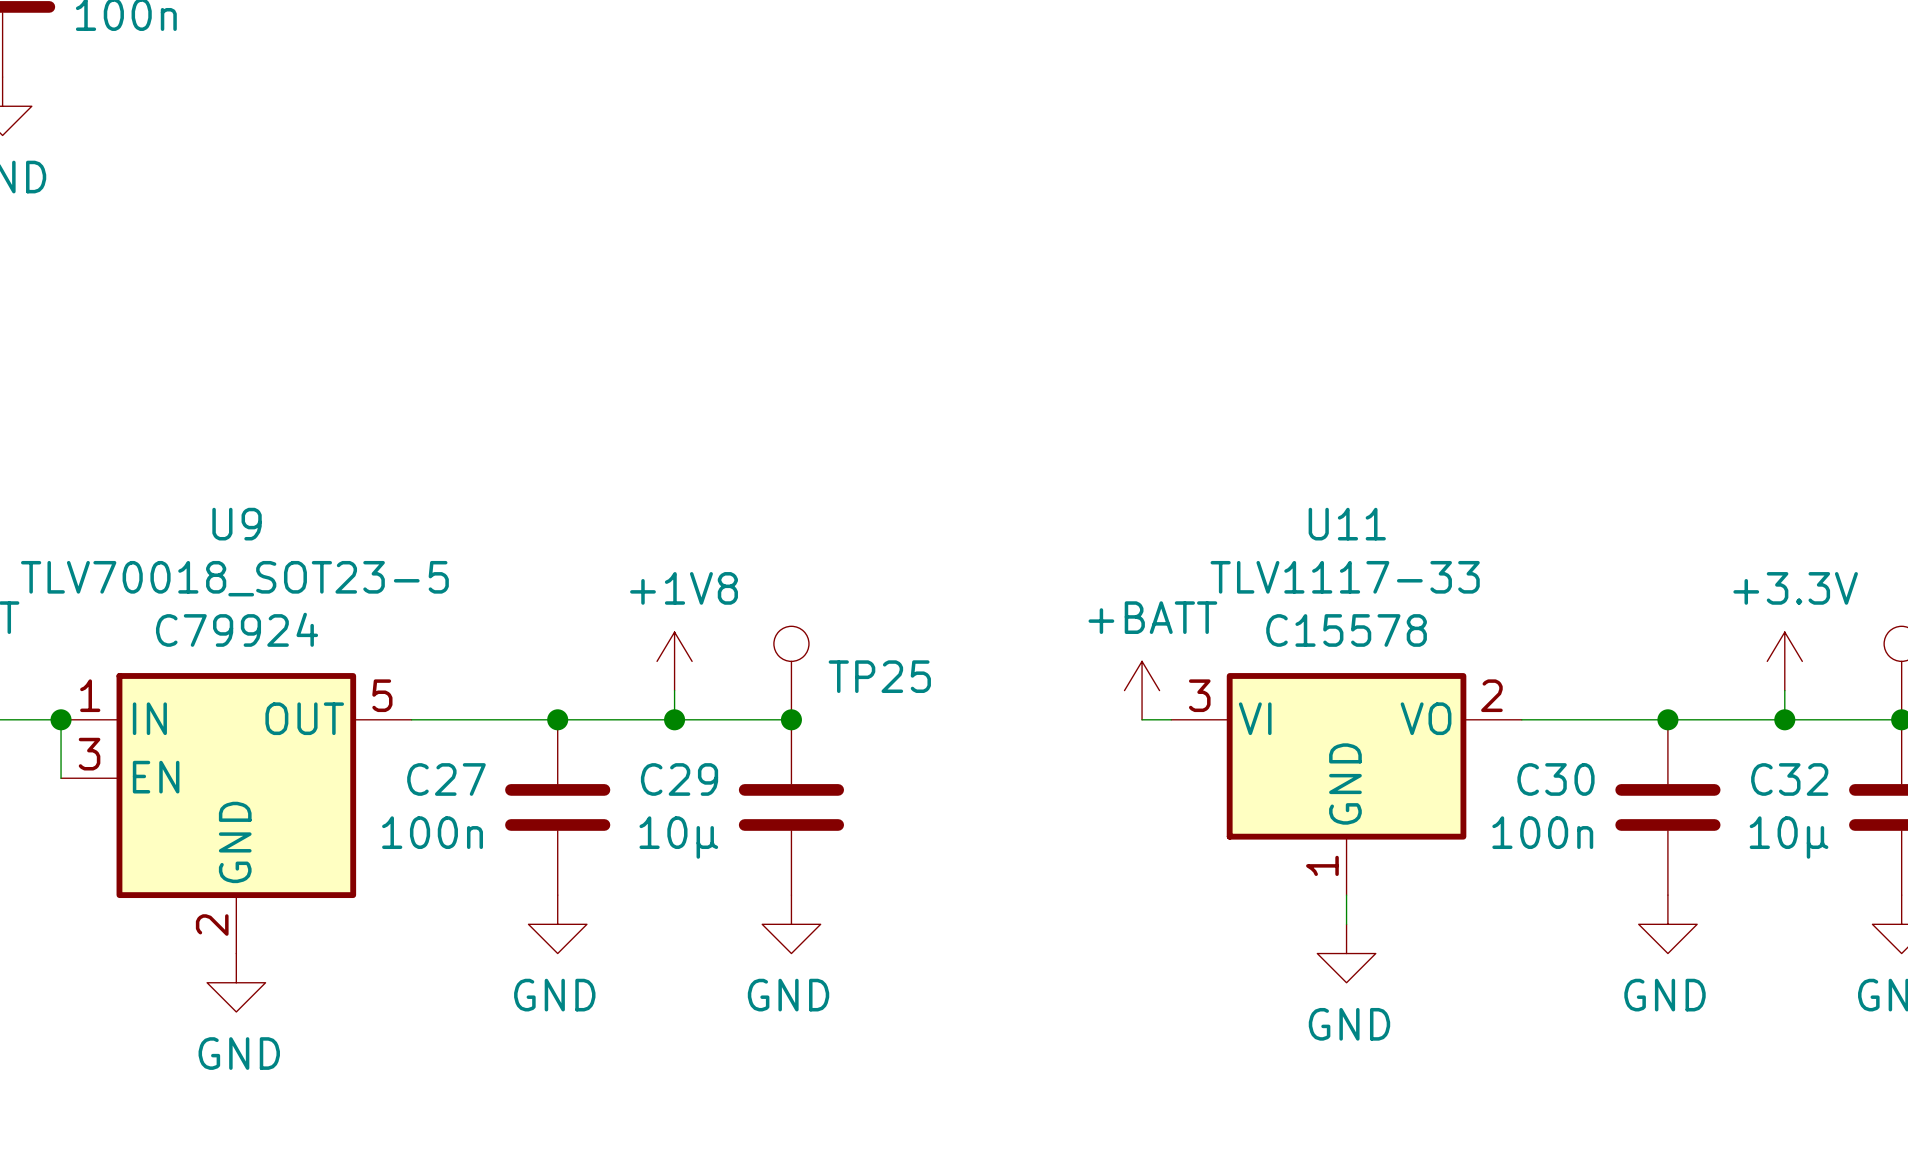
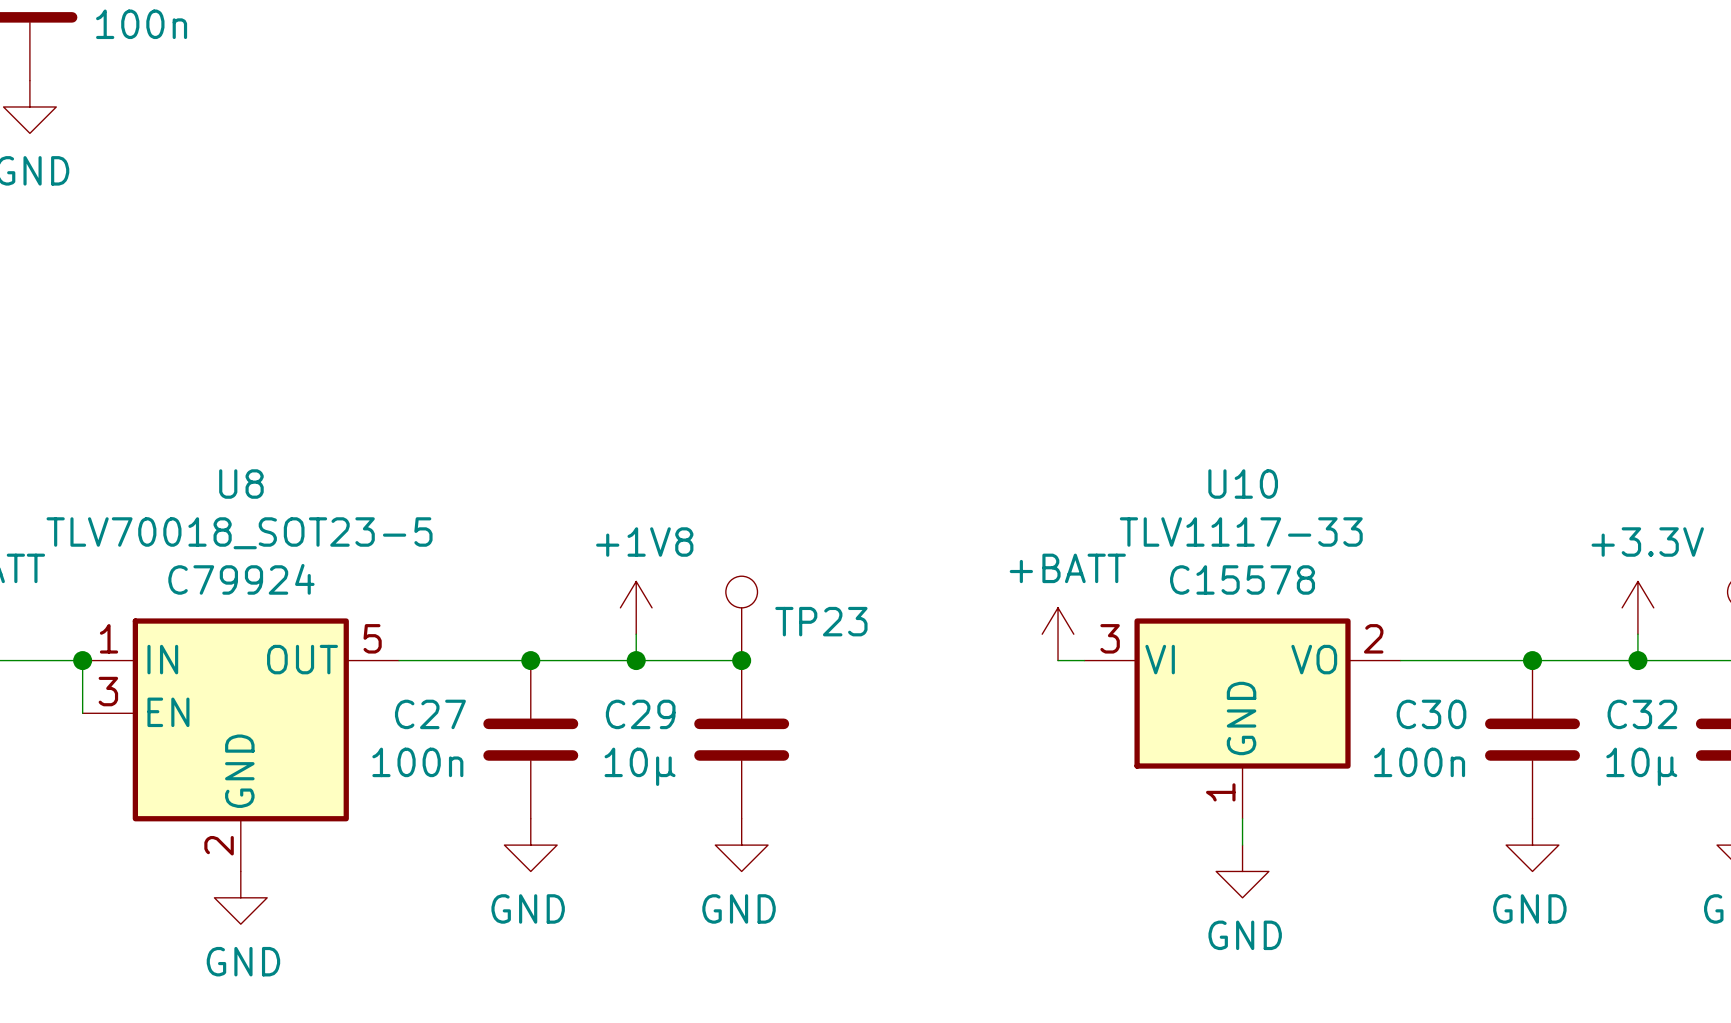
U9 name: U9 (237, 524) -> U8 (241, 484)
U11 name: U11 (1347, 524) -> U10 (1243, 484)
TP25 name: TP25 (879, 676) -> TP23 (821, 621)

